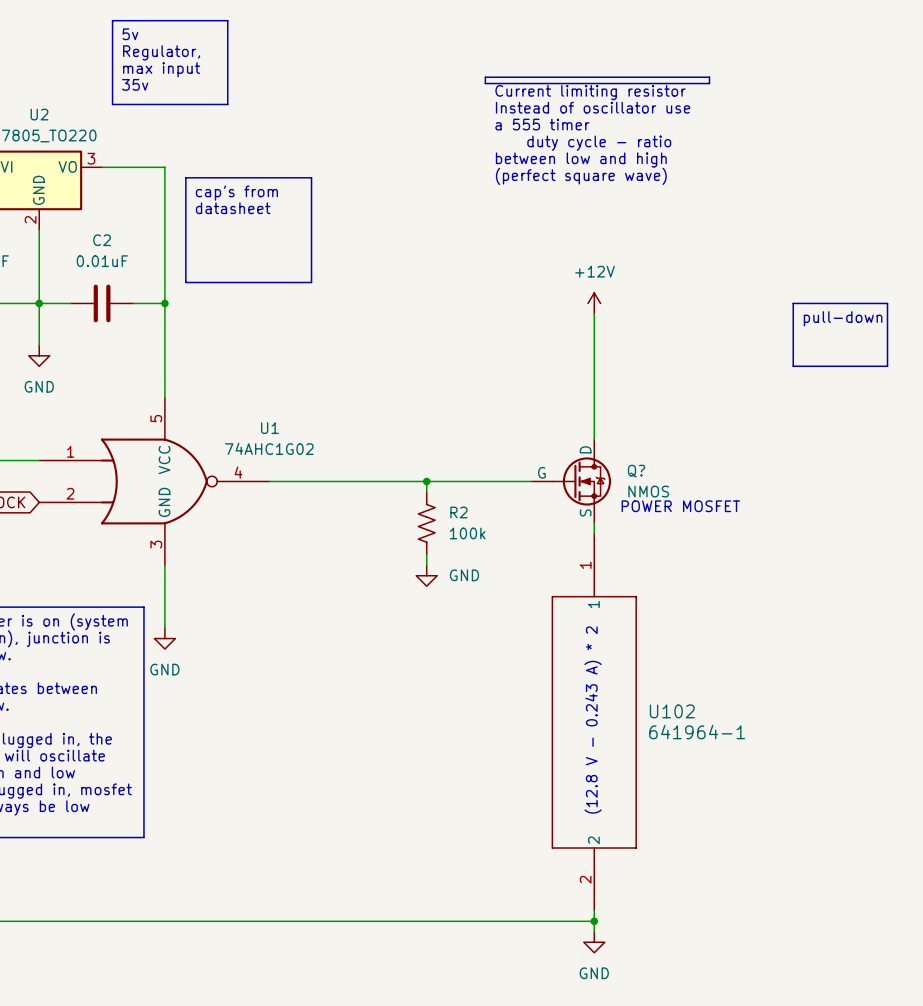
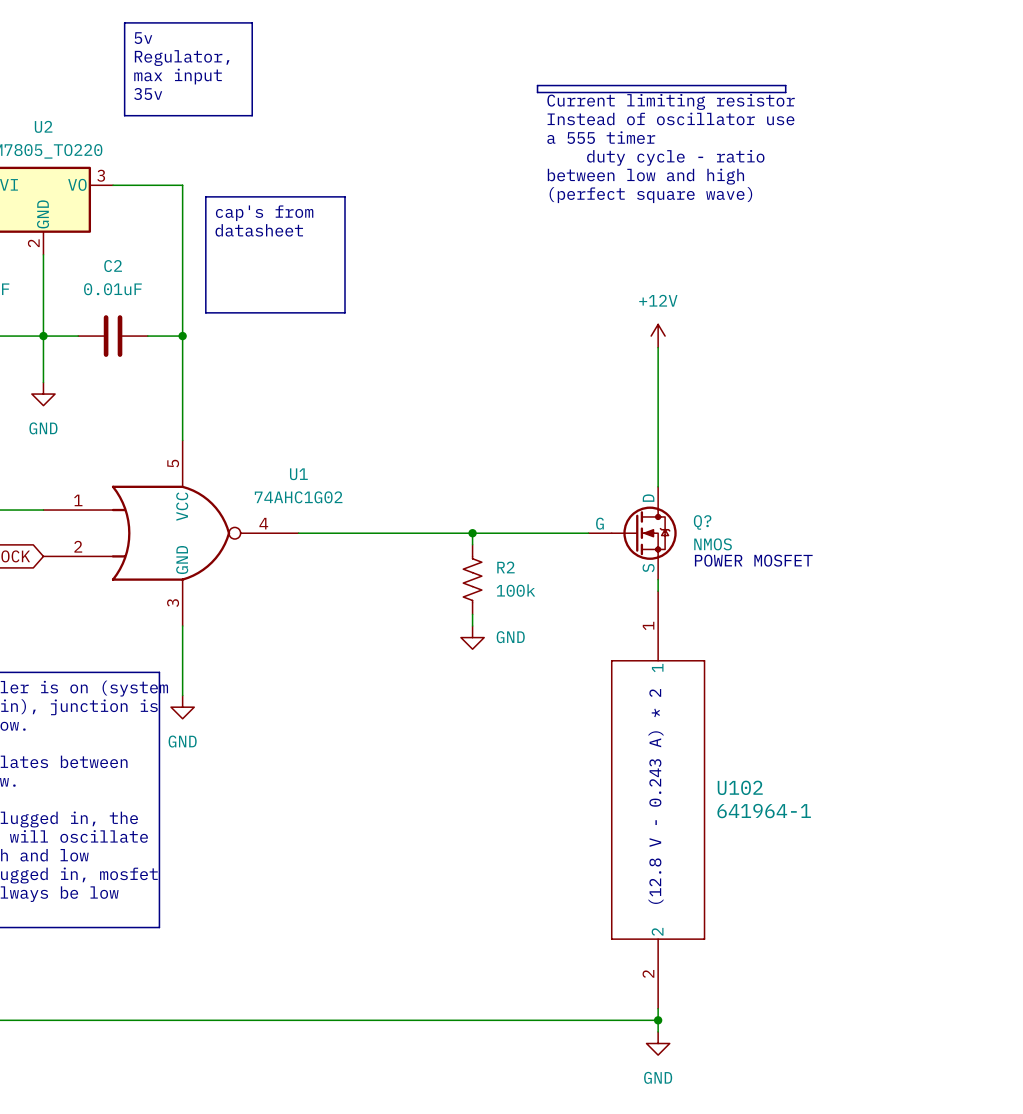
line: (793, 303) (887, 303) (887, 366) (793, 366) (793, 303) -> none
text: pull-down (843, 318) -> none

